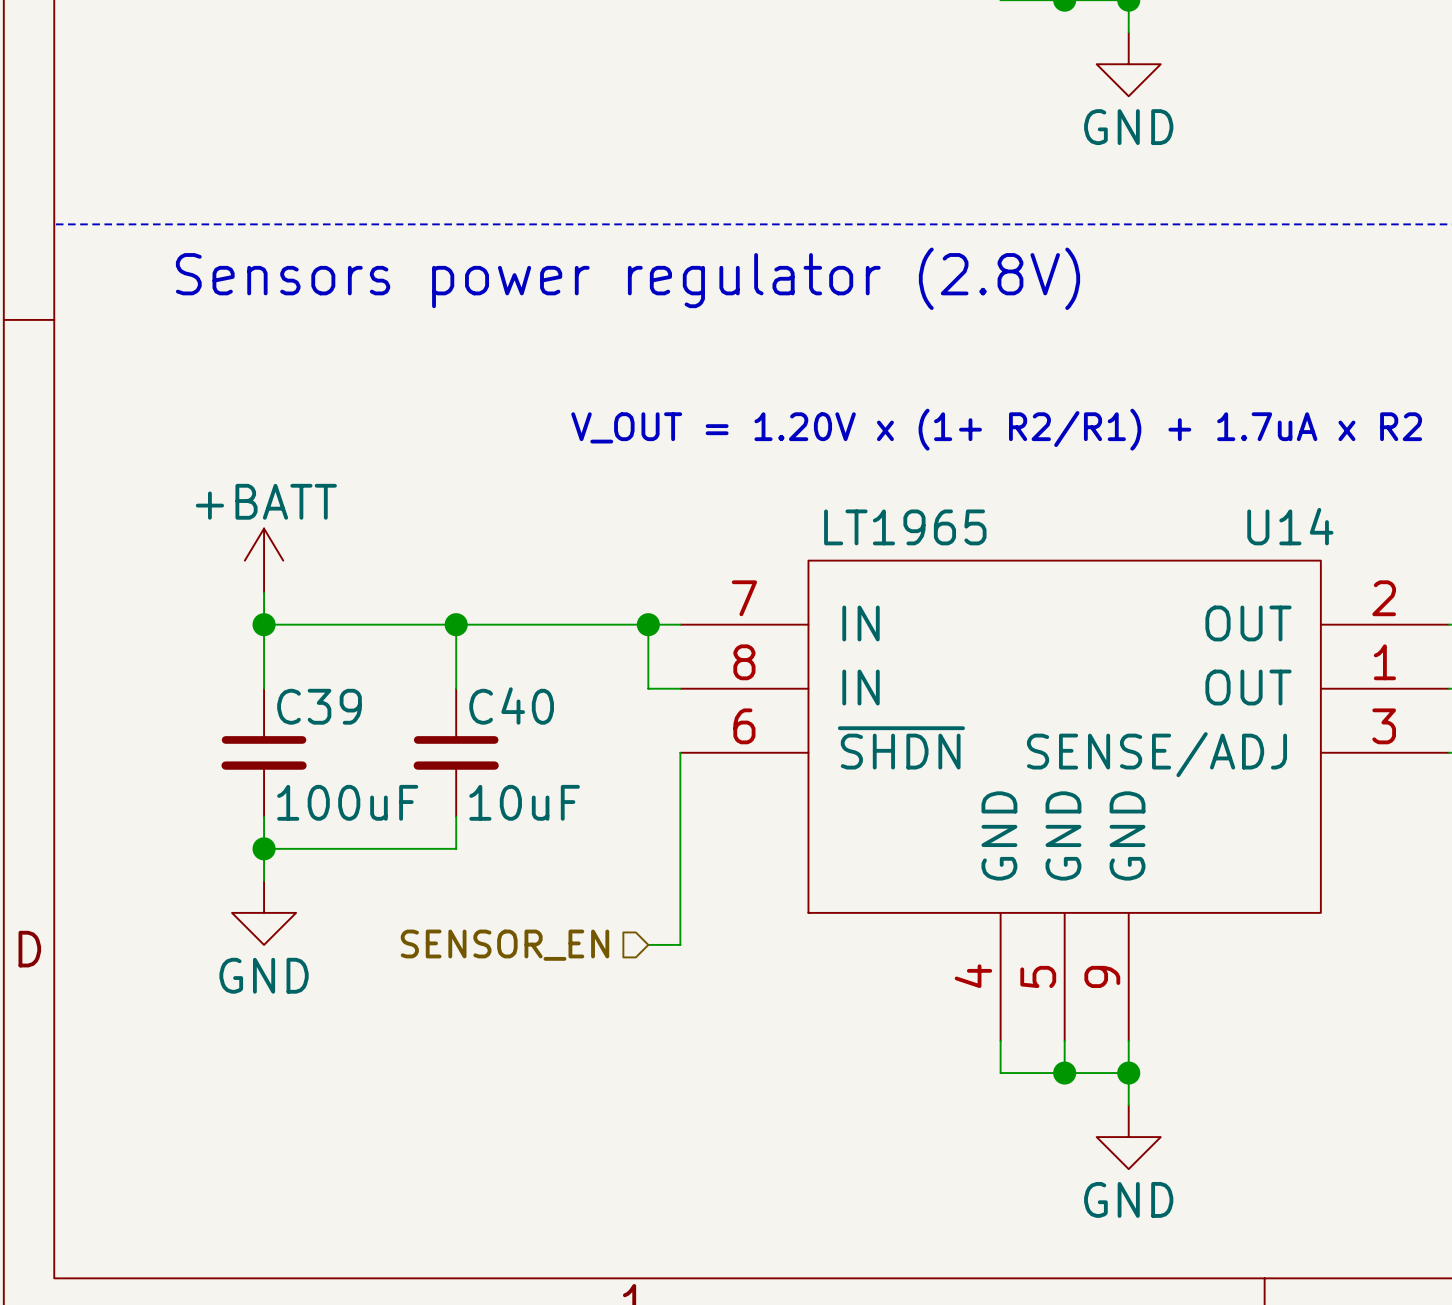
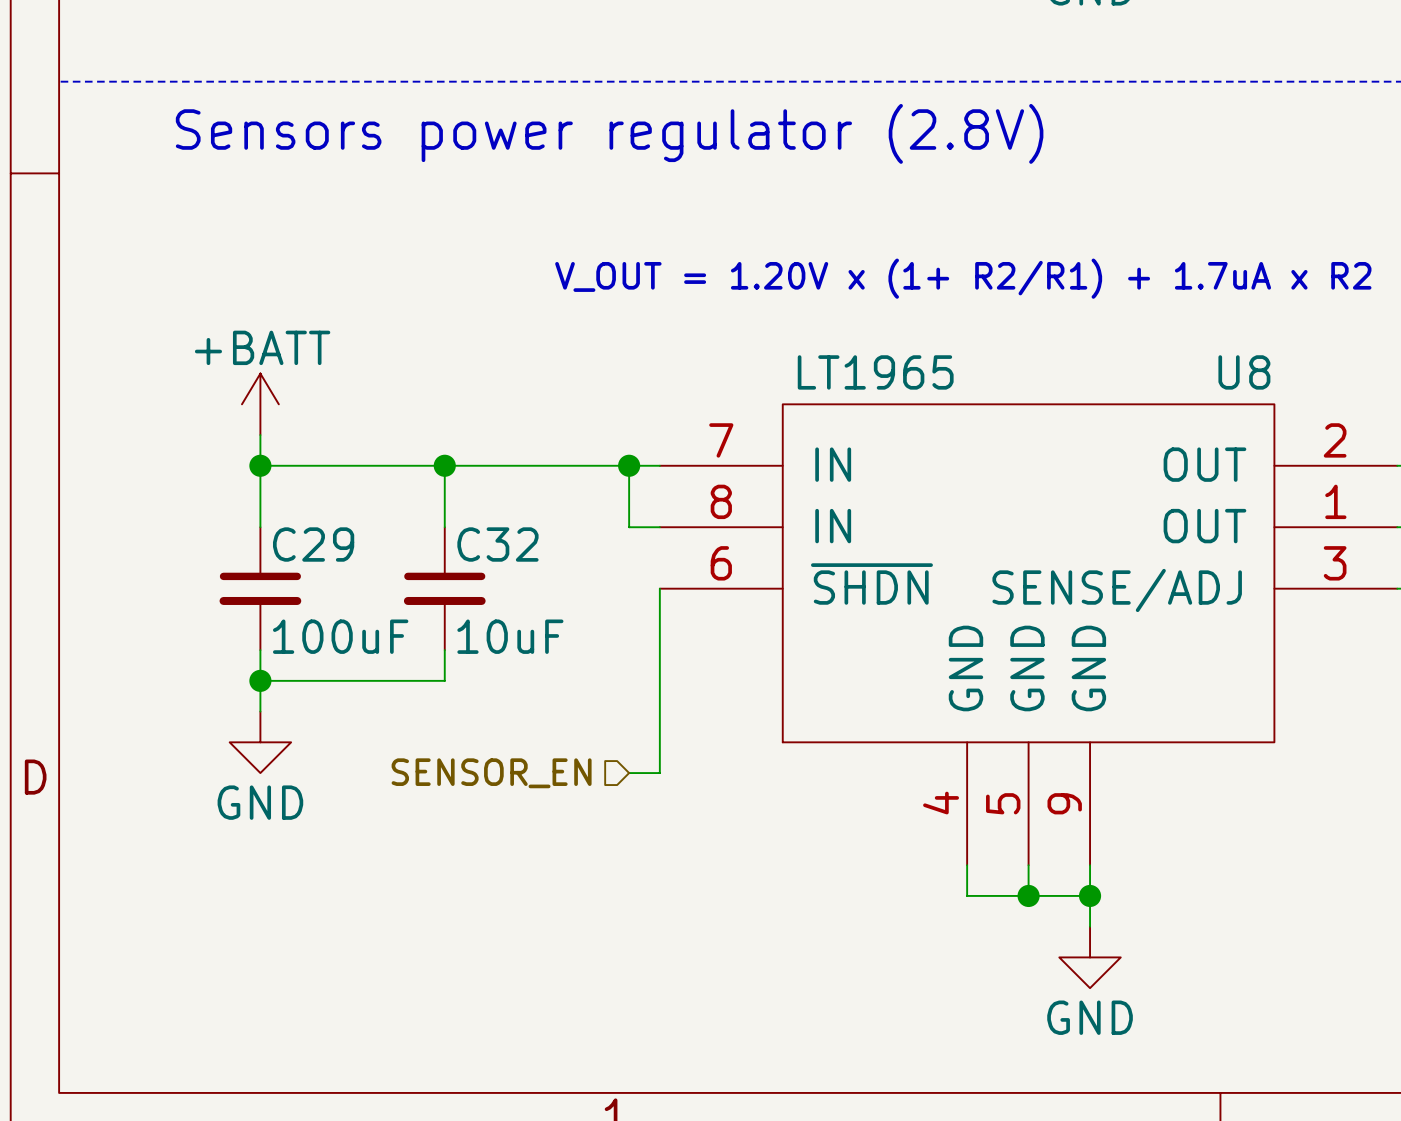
U14 name: U14 (1290, 526) -> U8 (1244, 372)
C40 name: C40 (511, 705) -> C32 (497, 544)
C39 name: C39 (319, 706) -> C29 (313, 544)

